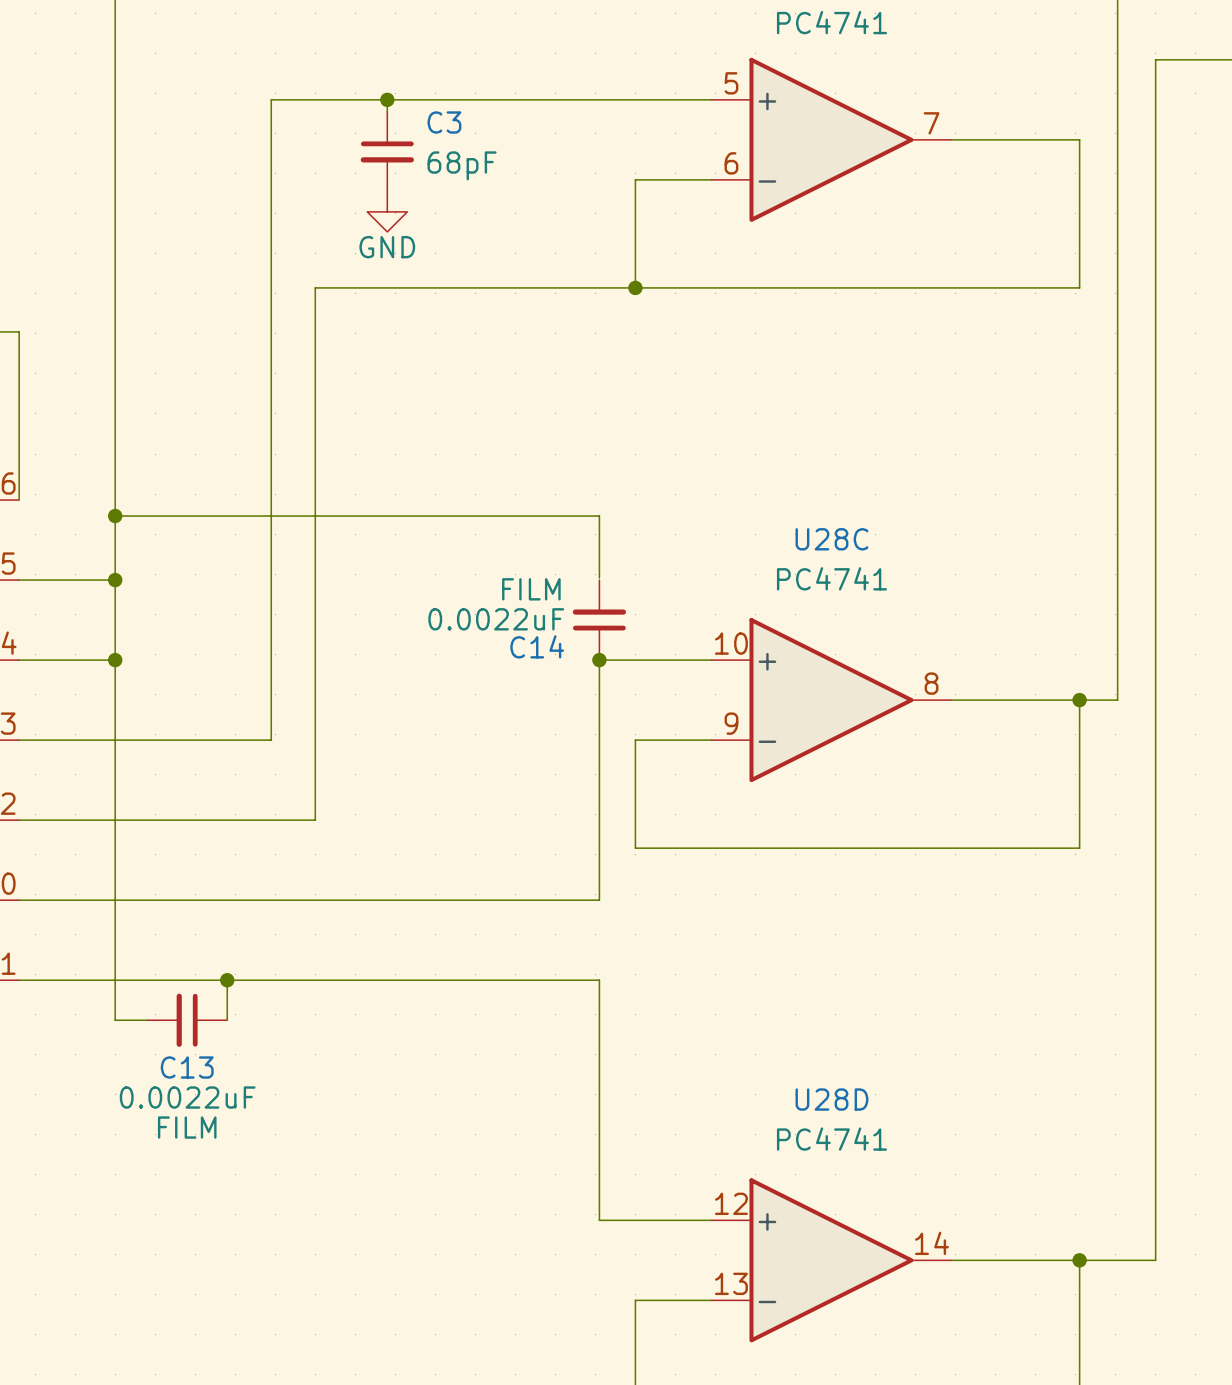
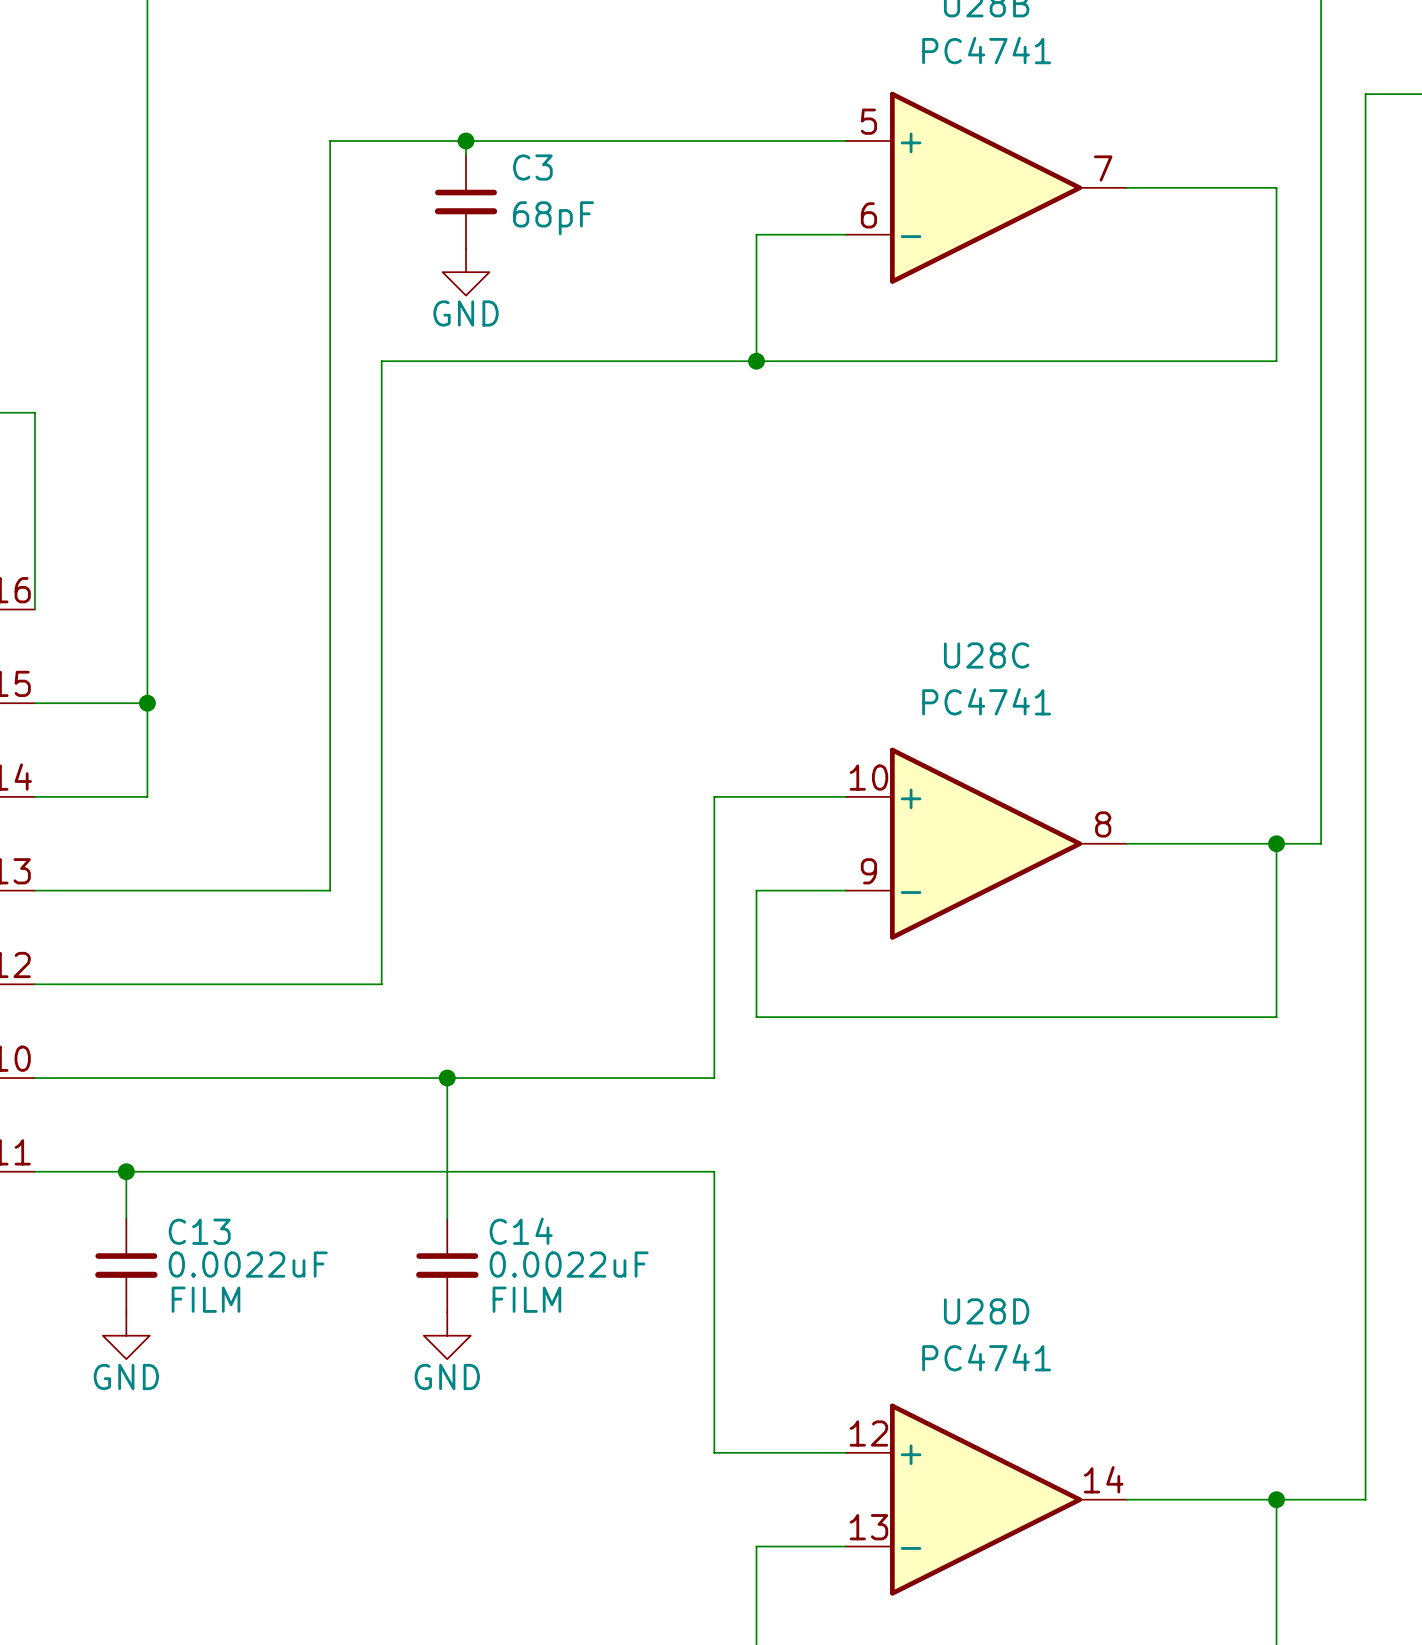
wire: (115, 516) (599, 516) (599, 578) -> none
junction: (115, 516) -> none
C14 rotation: 0° (599, 619) -> 180° (447, 1265)
C14 position: (599, 620) -> (447, 1265)
wire: (115, 660) (115, 1020) (147, 1020) -> none
junction: (115, 660) -> none
junction: (599, 660) -> none
wire: none -> (447, 1078) (447, 1218)
junction: none -> (447, 1078)
junction: none -> (126, 1171)
wire: (227, 980) (227, 1020) -> (126, 1171) (126, 1218)
junction: (227, 980) -> none
C13 rotation: 0° (187, 1020) -> 90° counterclockwise (126, 1265)
C13 position: (187, 1020) -> (126, 1265)
C13 name position: C13 (187, 1067) -> C13 (199, 1231)
C13 value position: 0.0022uF (187, 1097) -> 0.0022uF (248, 1264)
power symbol: none -> GND (126, 1335)
power symbol: none -> GND (447, 1335)
C13 text position: FILM (187, 1127) -> FILM (205, 1299)

